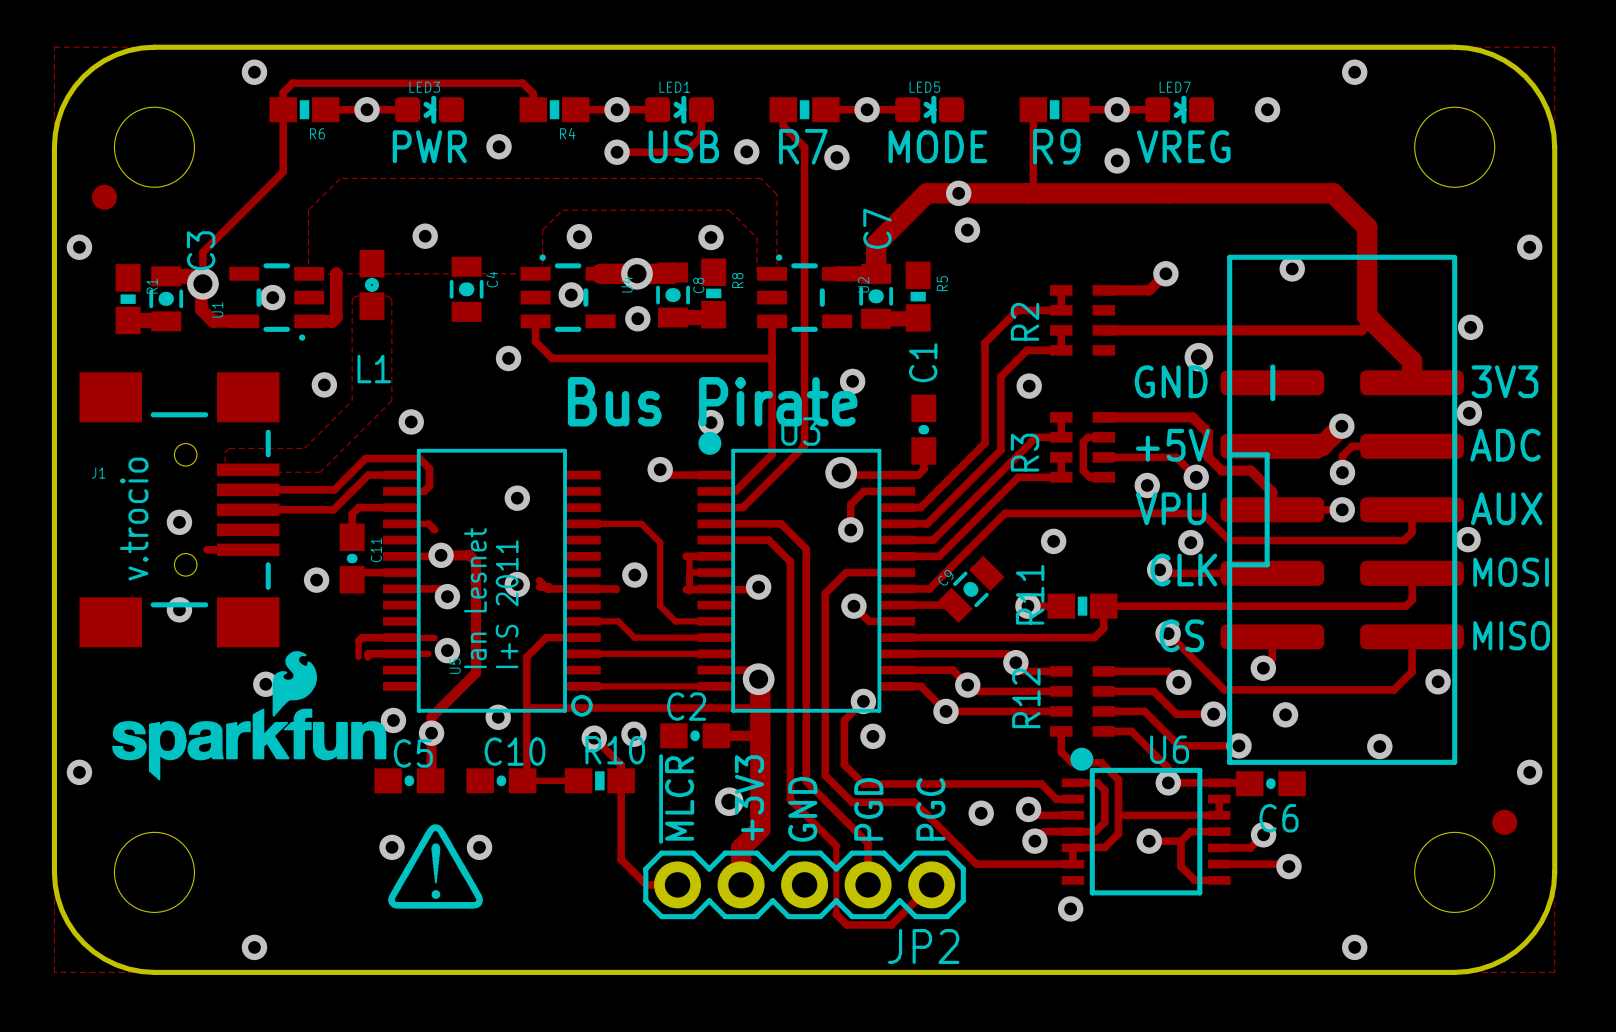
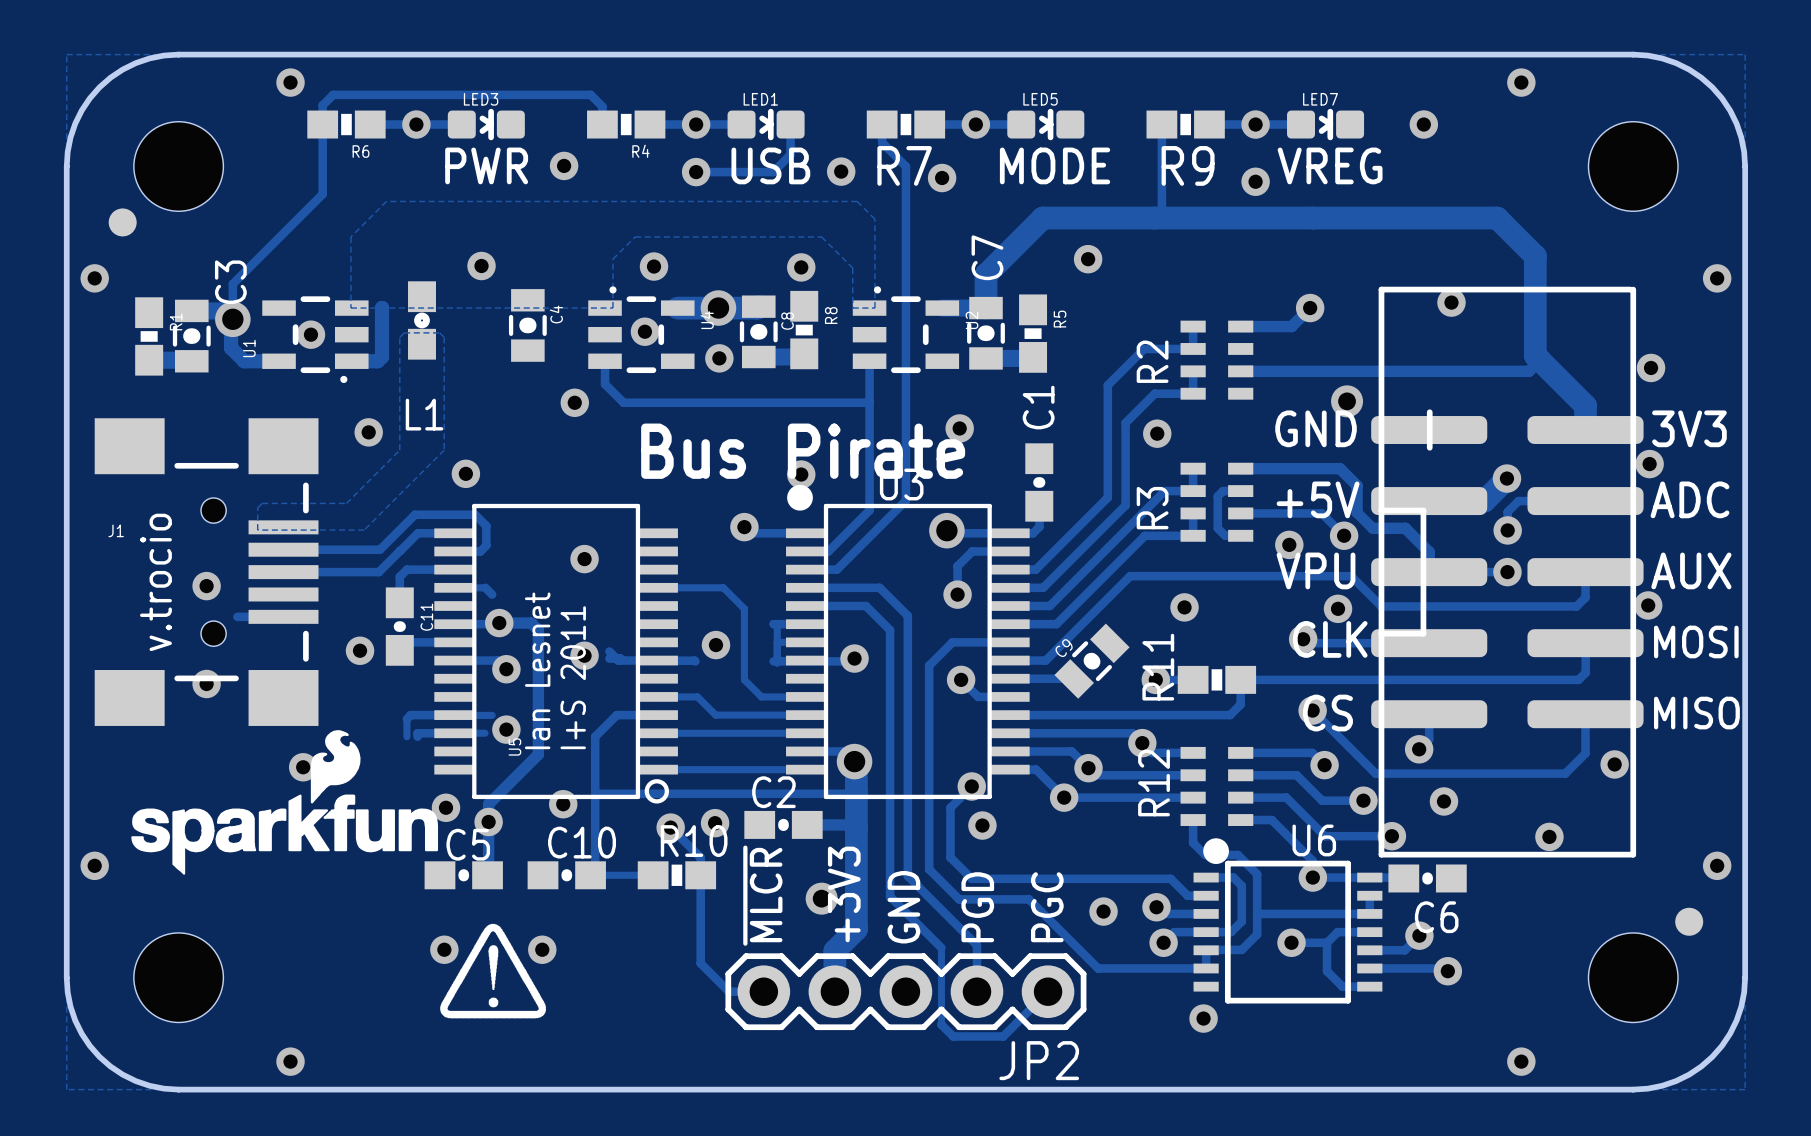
via: (958, 193) -> none

